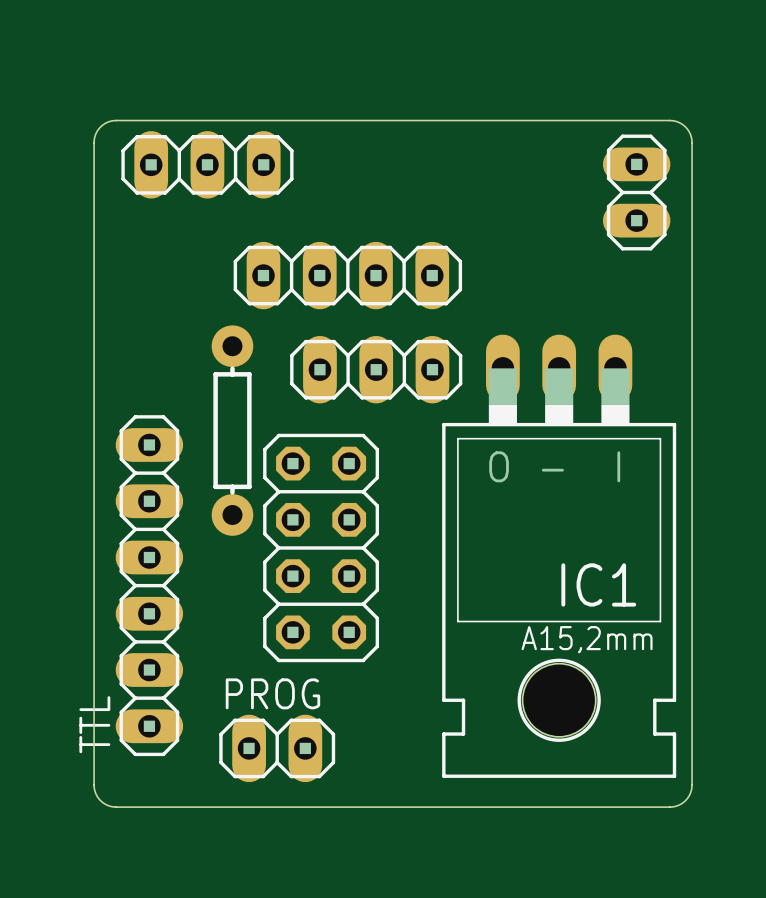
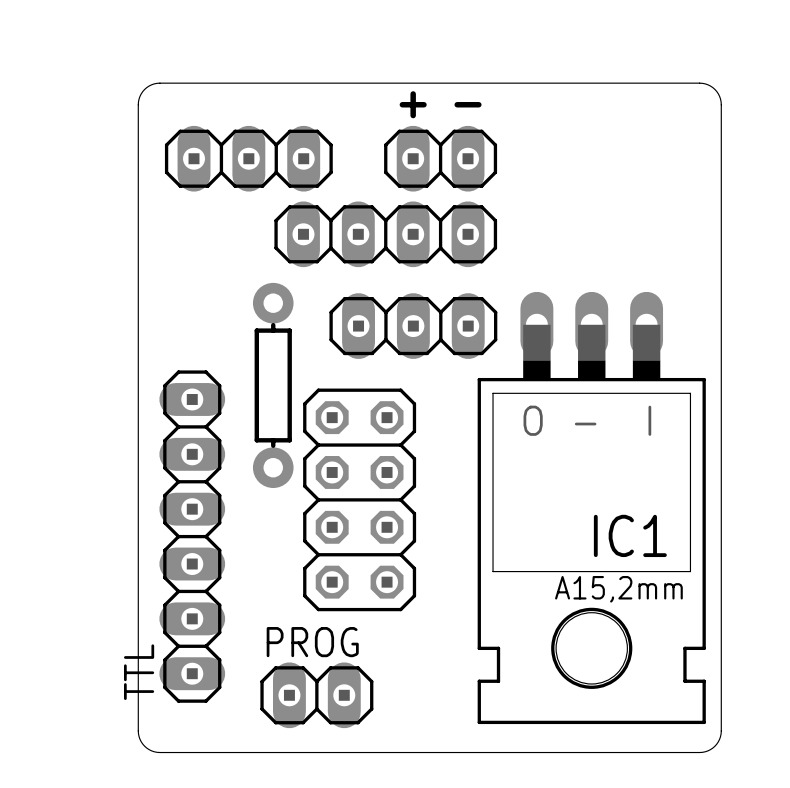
line: none -> (413, 93) (413, 115)
line: none -> (402, 104) (423, 104)
line: none -> (457, 104) (478, 104)
part position: (207, 164) -> (248, 158)
part rotation: 0° (636, 192) -> 90° clockwise (440, 158)
part position: (636, 192) -> (440, 158)

